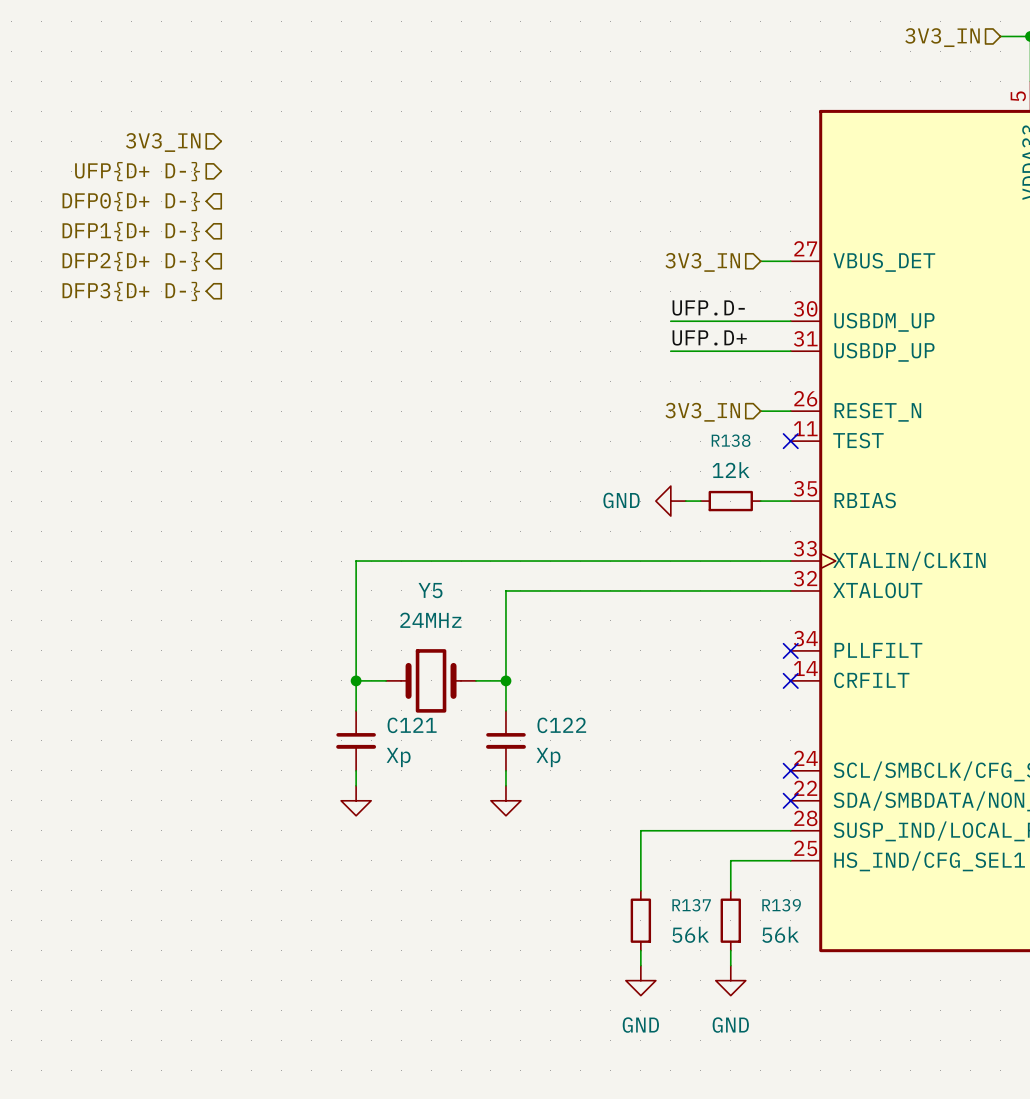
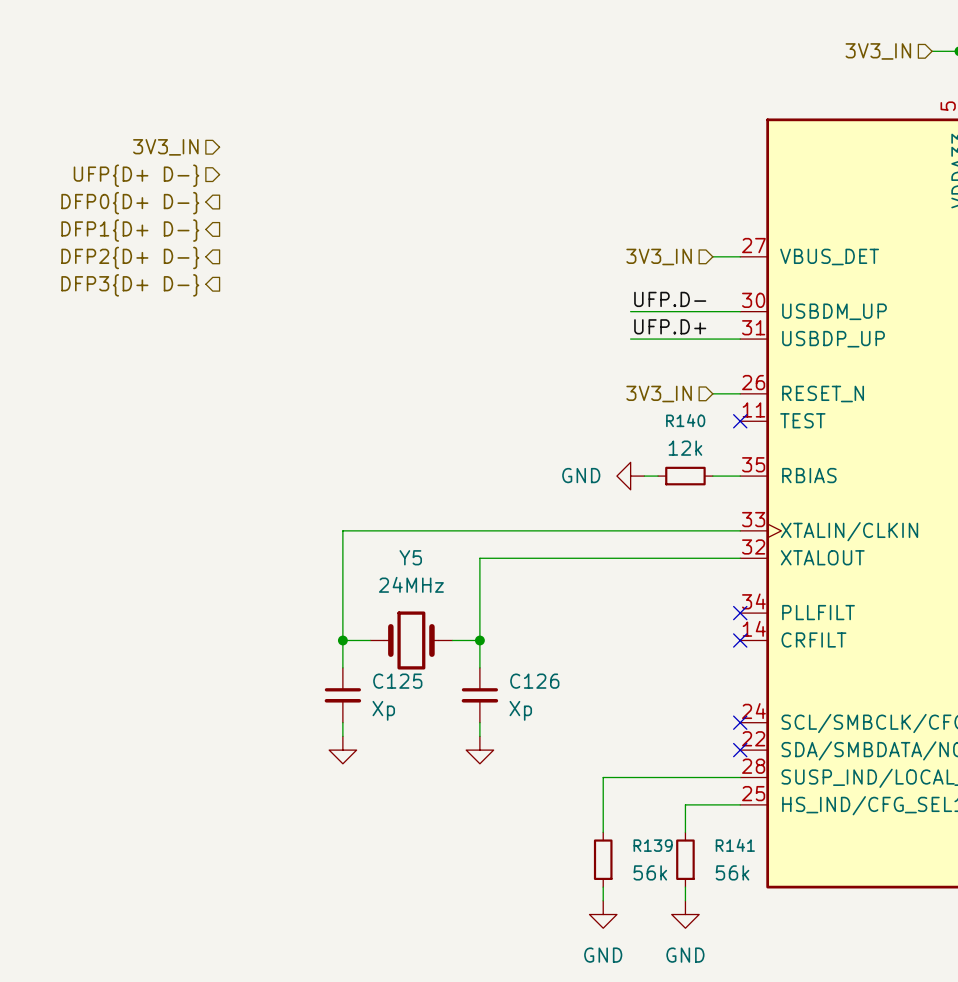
R138 name: R138 (731, 440) -> R140 (685, 420)
C121 name: C121 (412, 725) -> C125 (397, 681)
C122 name: C122 (561, 725) -> C126 (534, 681)
R137 name: R137 (691, 905) -> R139 (653, 845)
R139 name: R139 (781, 905) -> R141 (735, 845)

